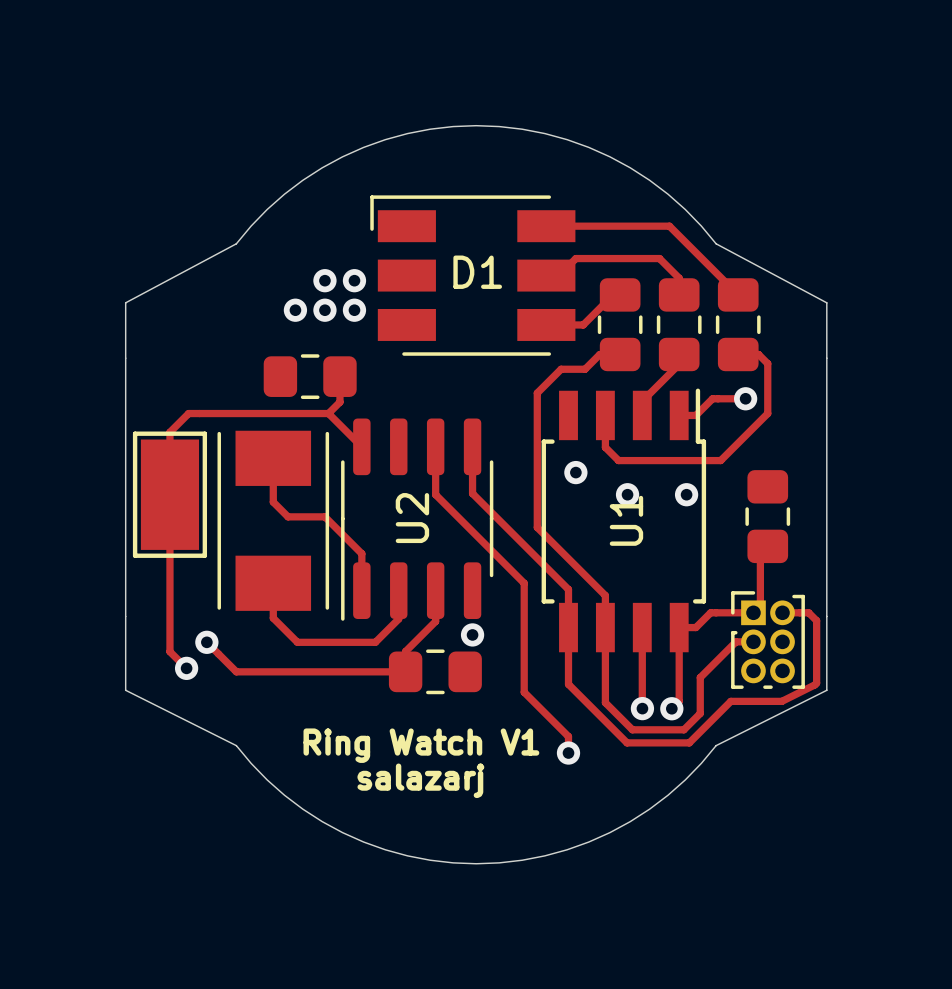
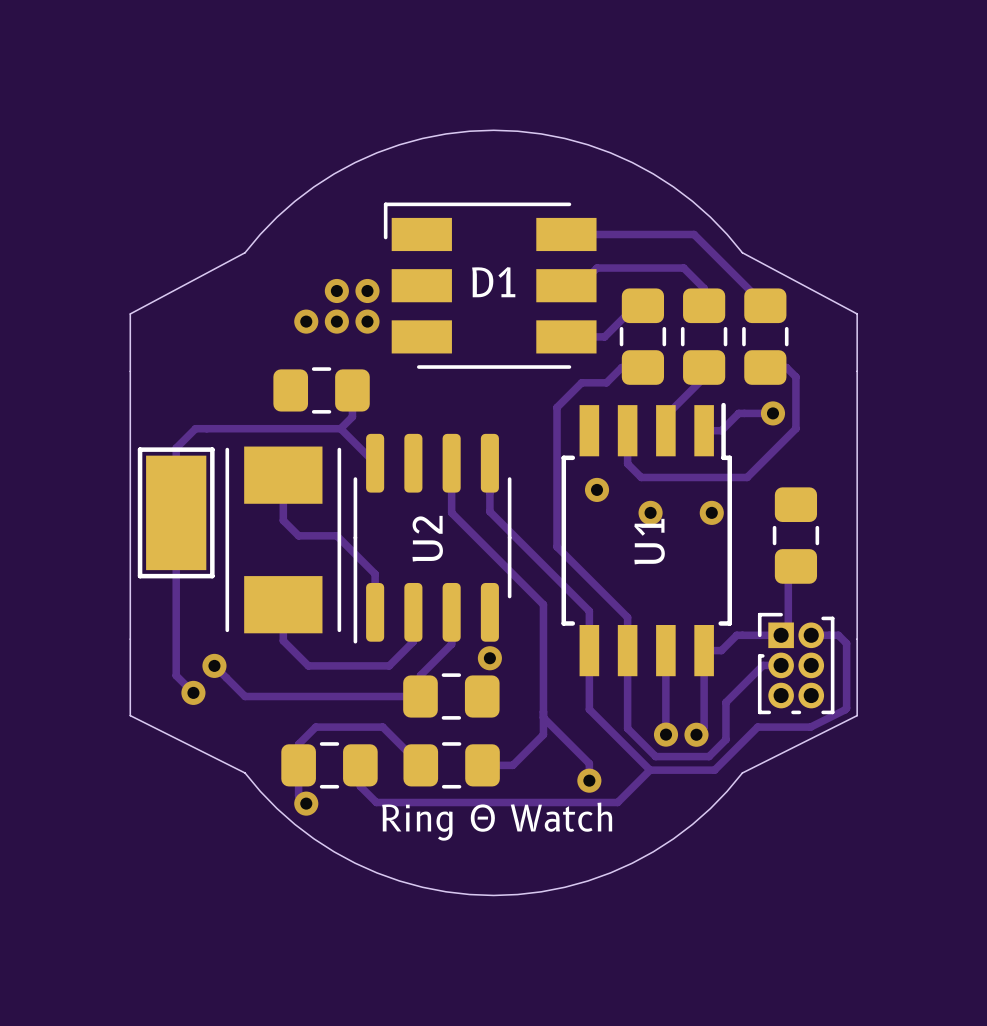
track: none -> (543, 717) (543, 734) (512, 765) (482, 765)
part: none -> (329, 765)
track: none -> (360, 765) (360, 786) (376, 802) (617, 802) (650, 770)
track: none -> (420, 765) (382, 727) (315, 727) (298, 744) (298, 795) (306, 803)
part: none -> (451, 765)
text: Ring Watch V1 (421, 745) -> Ring Θ Watch (497, 821)
via: none -> (306, 803)
text: salazarj (420, 780) -> none

